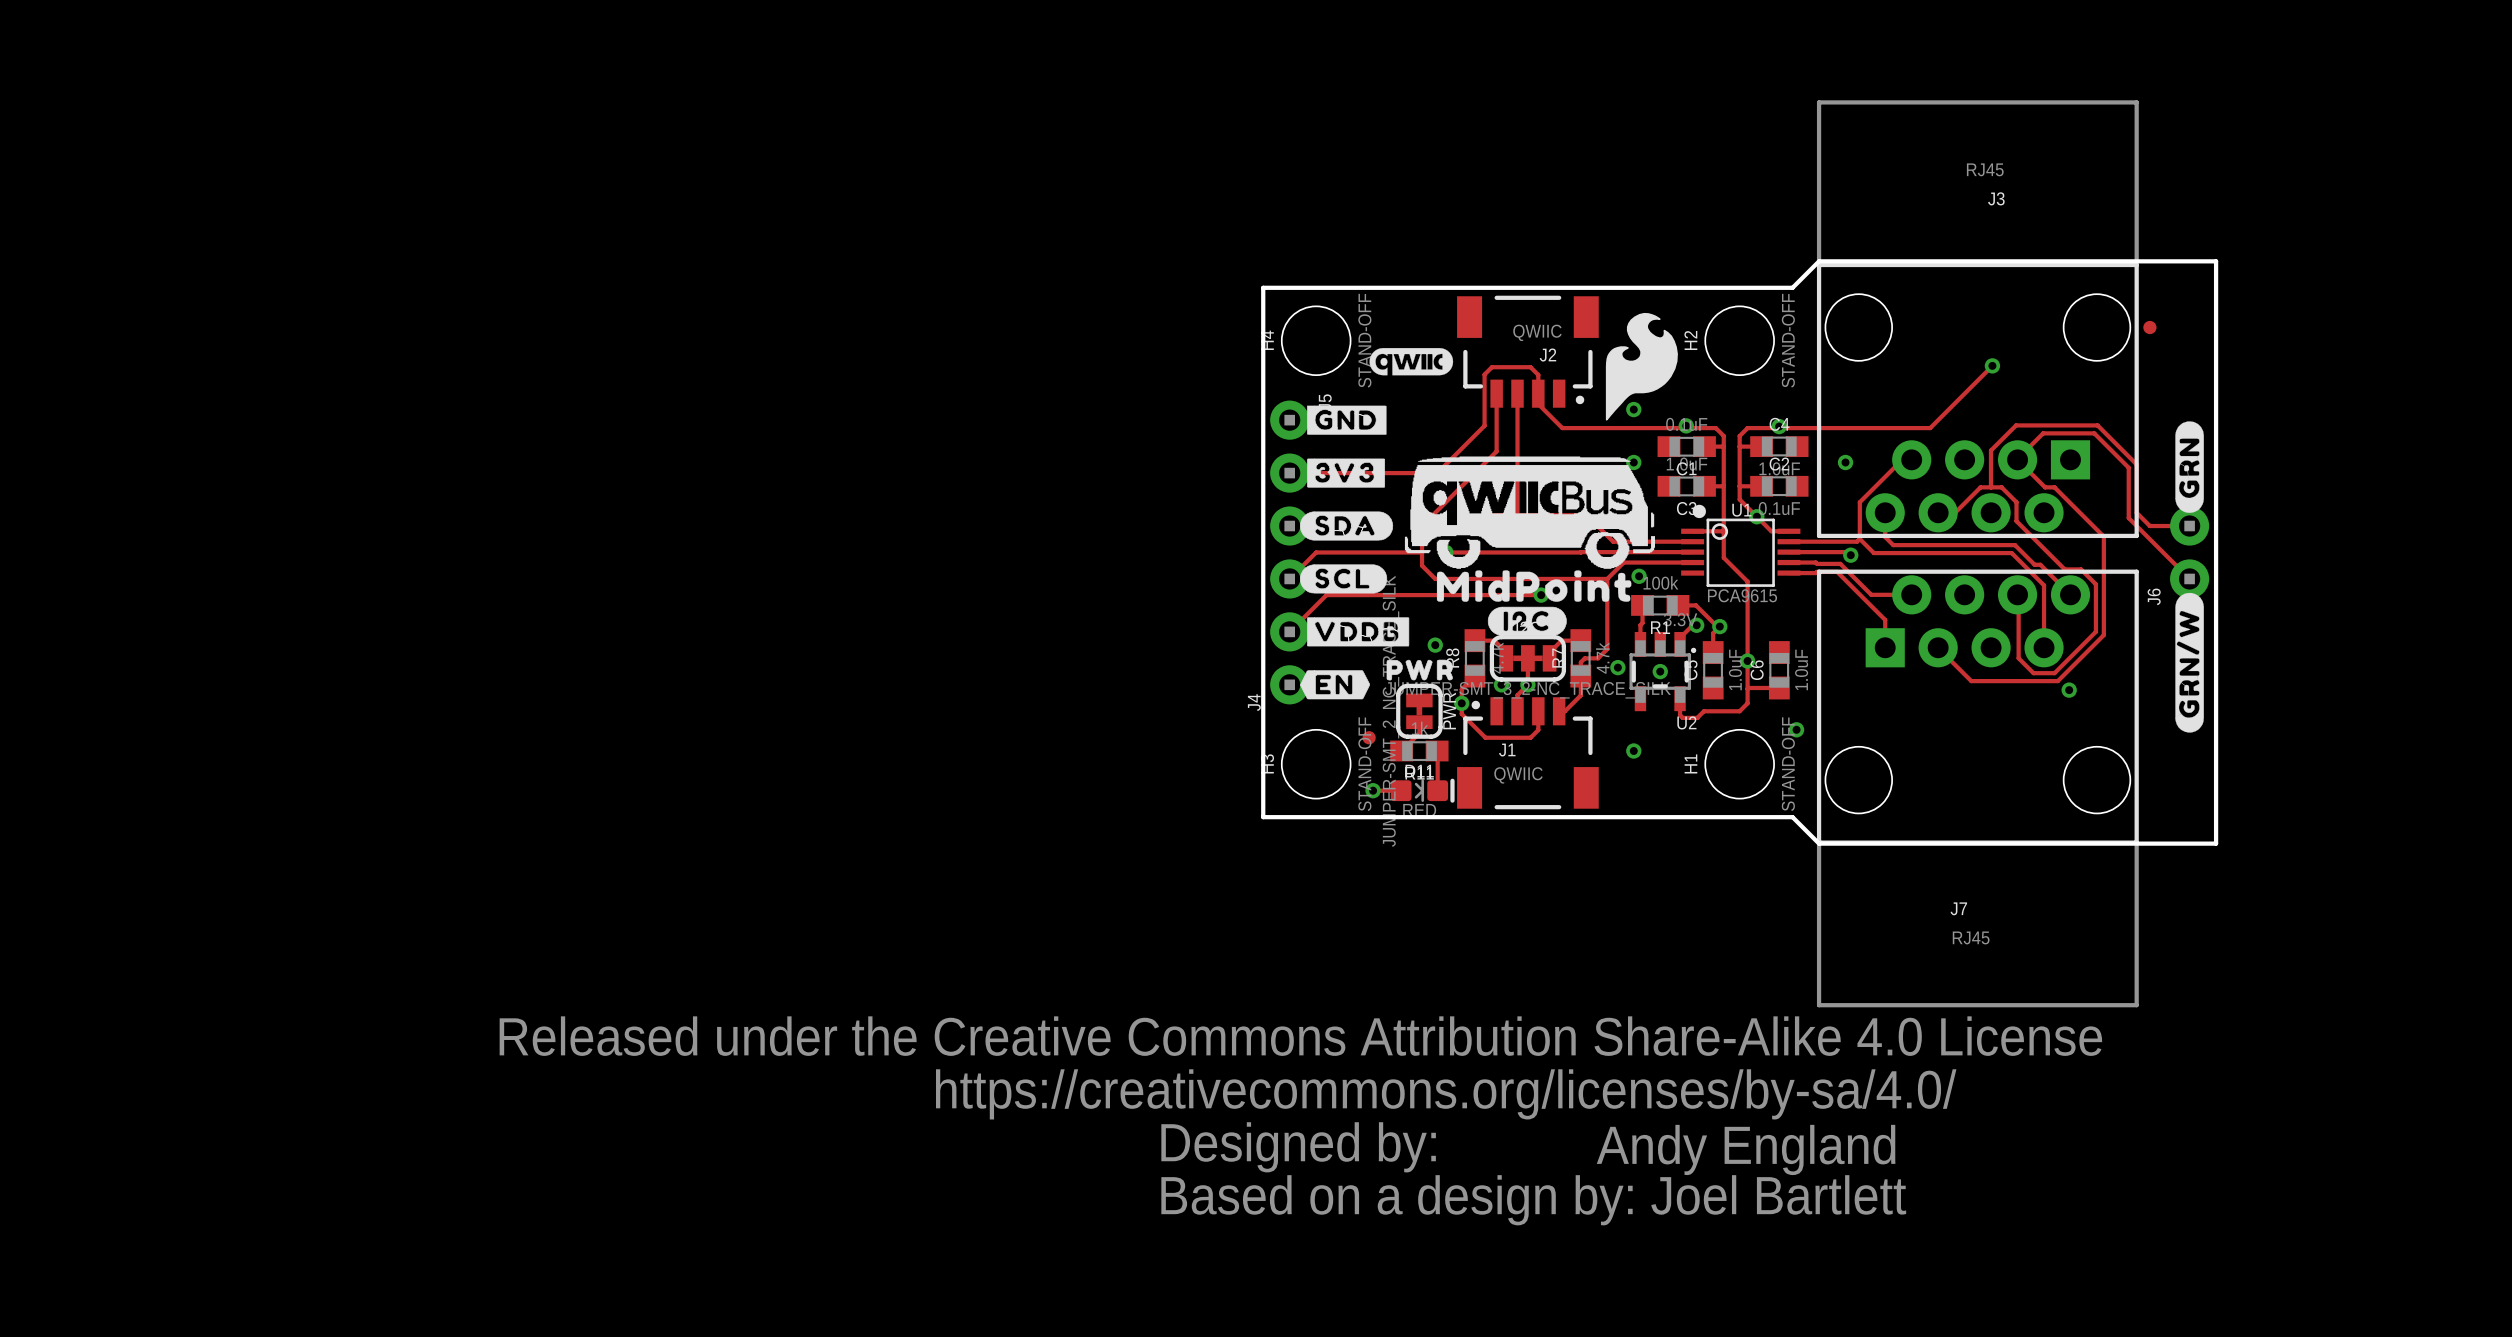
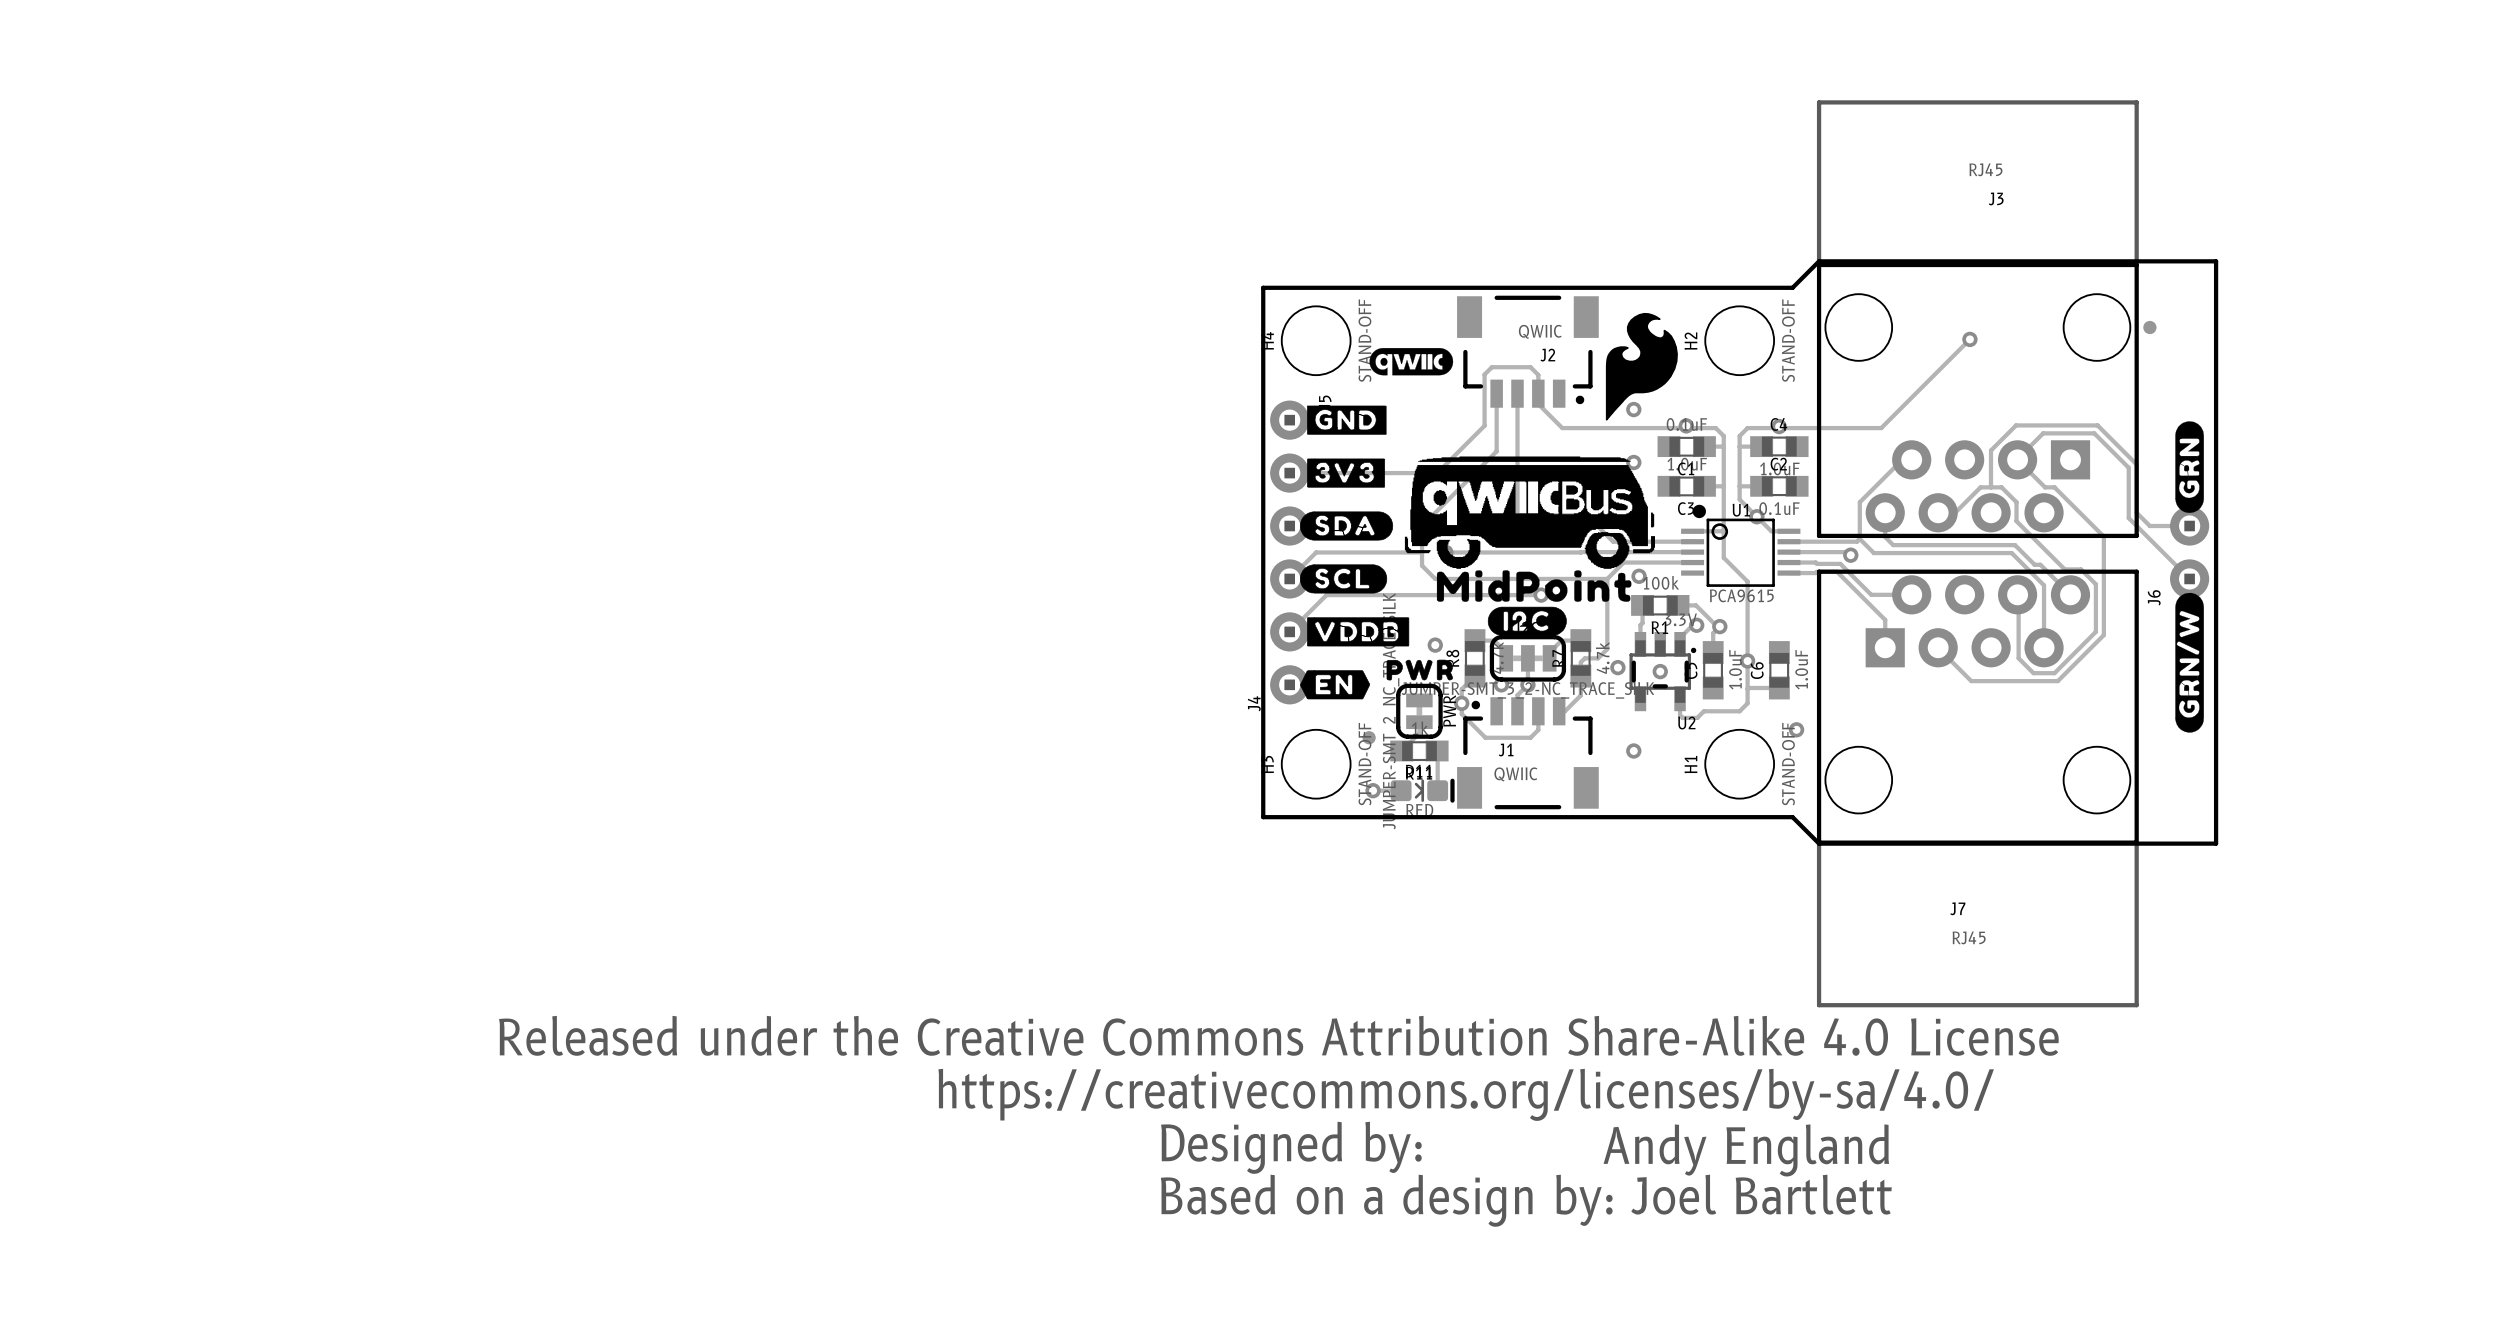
track: (1992, 365) (1930, 428) (1881, 428) -> (1969, 339) (1881, 428)
via position: (1992, 365) -> (1969, 339)
via: (1845, 462) -> none
via: (2069, 690) -> none

